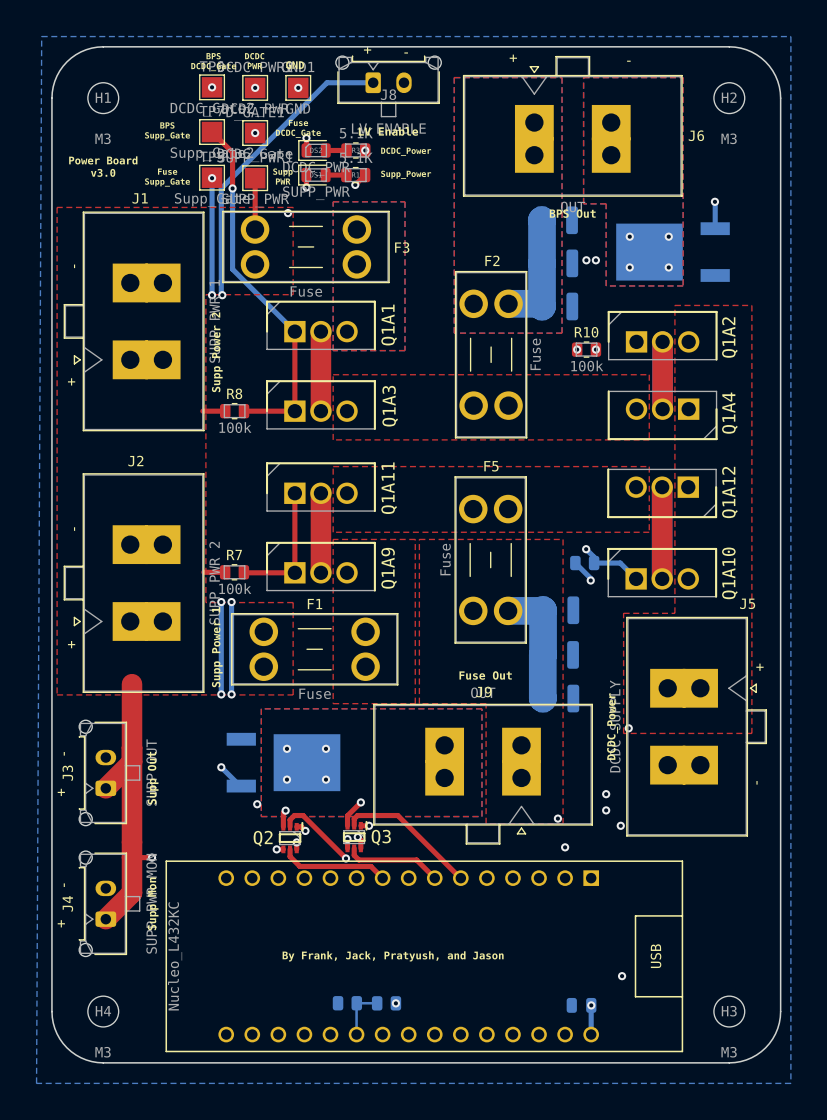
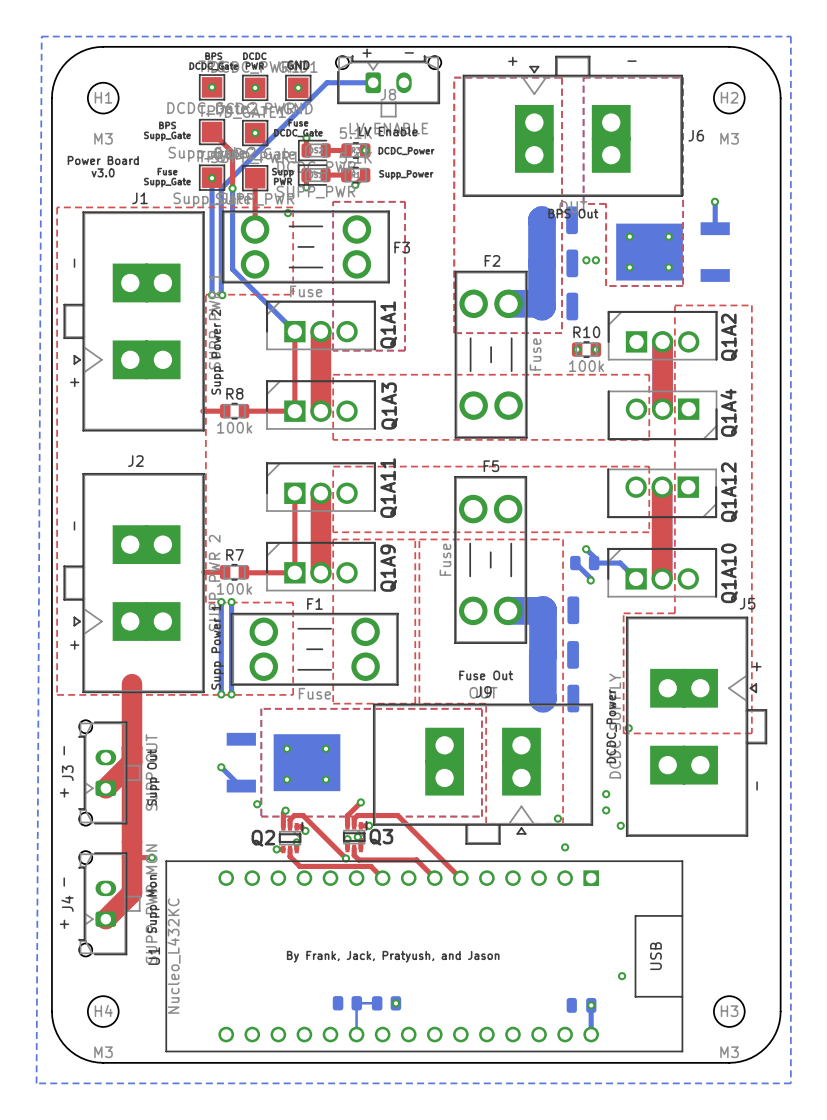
U1 name: none -> U1 (154, 956)

